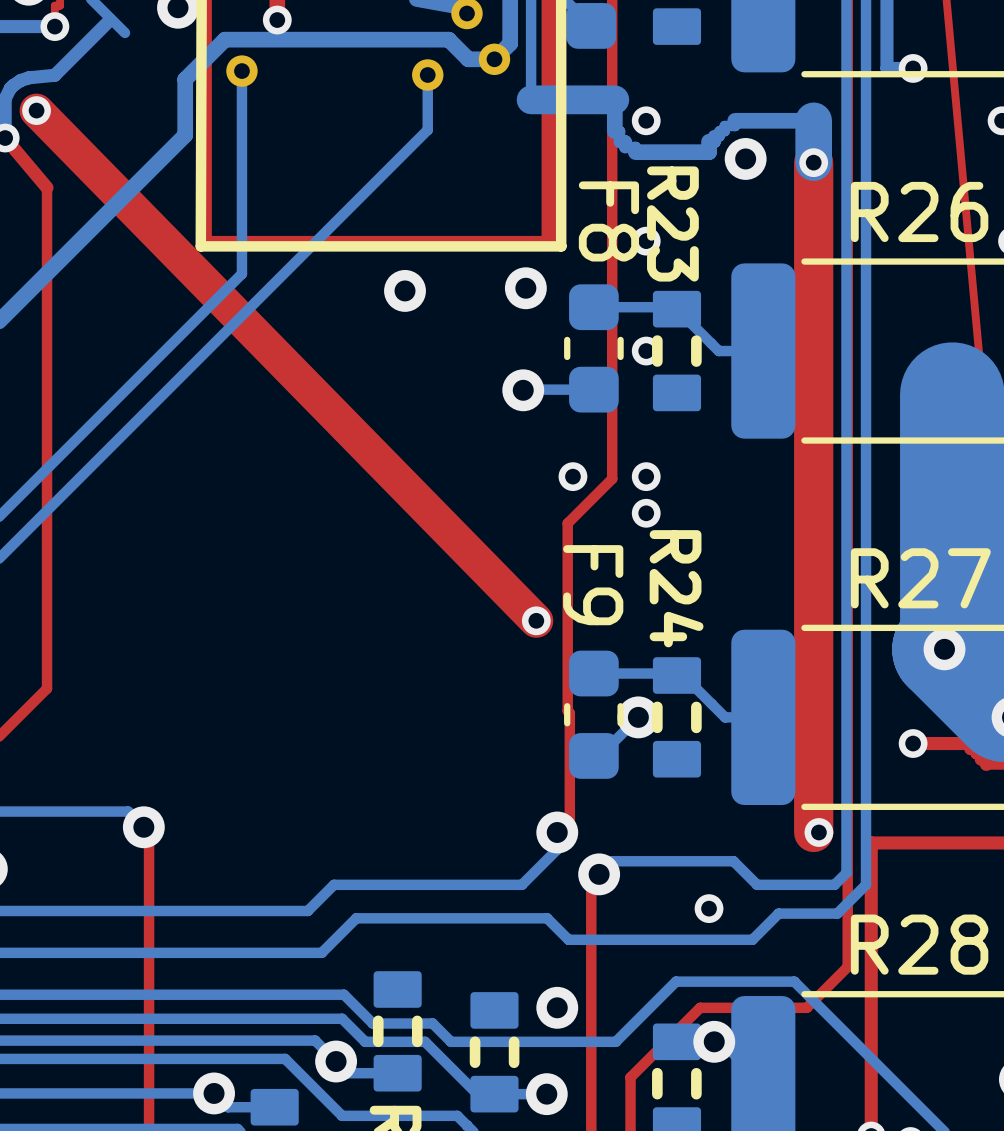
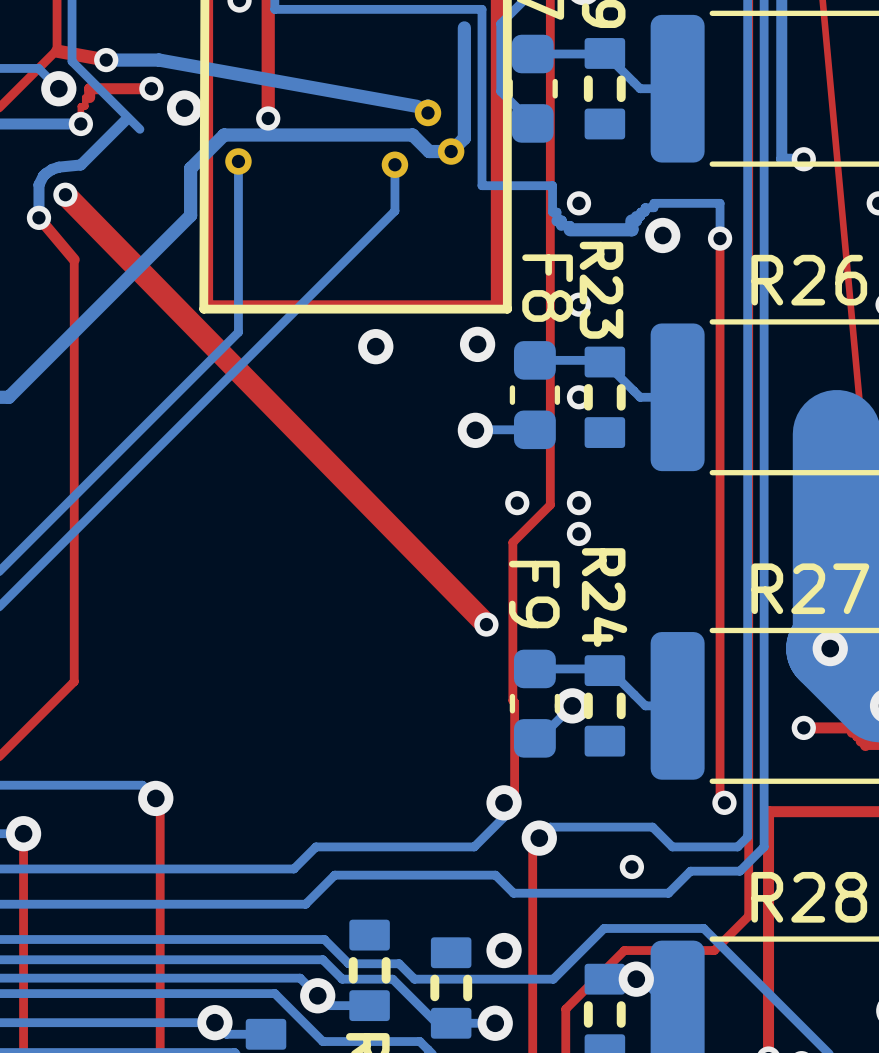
bottom track width: thick (531, 99) (614, 99) (614, 131) -> thin (482, 185) (552, 185) (552, 212)
top track width: thick (36, 110) (536, 620) -> thin (65, 194) (486, 624)
bottom track width: thick (735, 120) (813, 120) (813, 162) -> thin (653, 203) (720, 203) (720, 238)
top track width: thick (813, 162) (813, 832) (818, 832) -> thin (720, 238) (720, 802) (724, 802)

